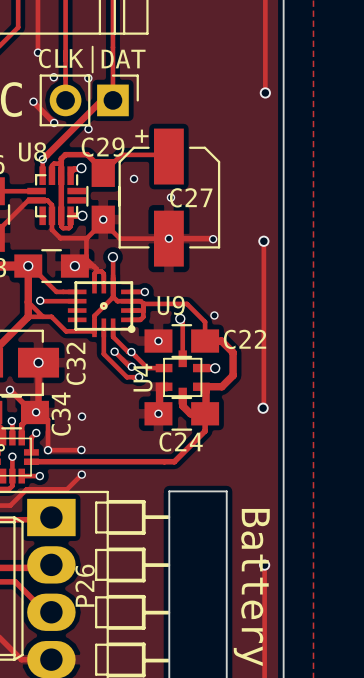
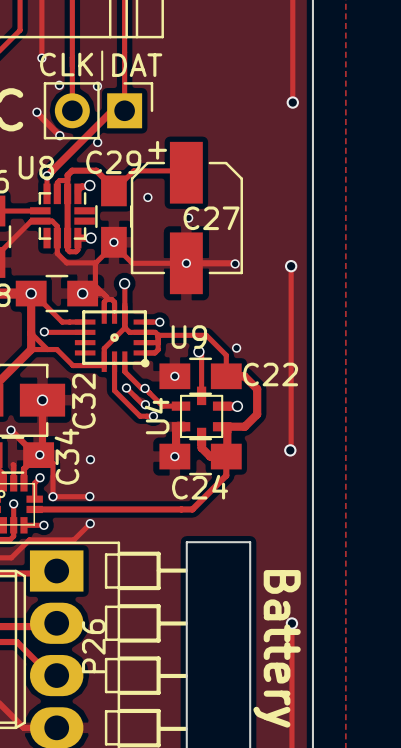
via: (11, 421) -> none

